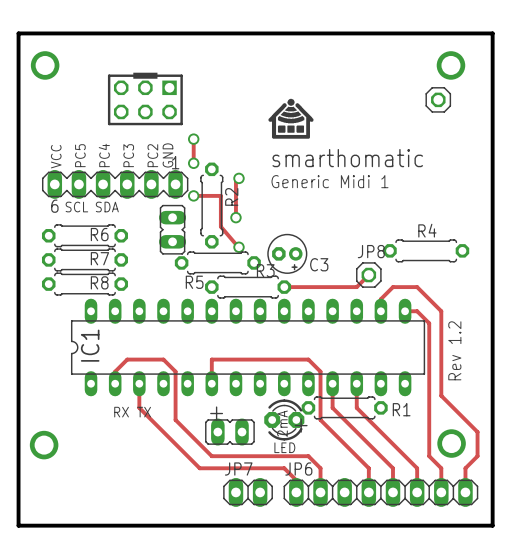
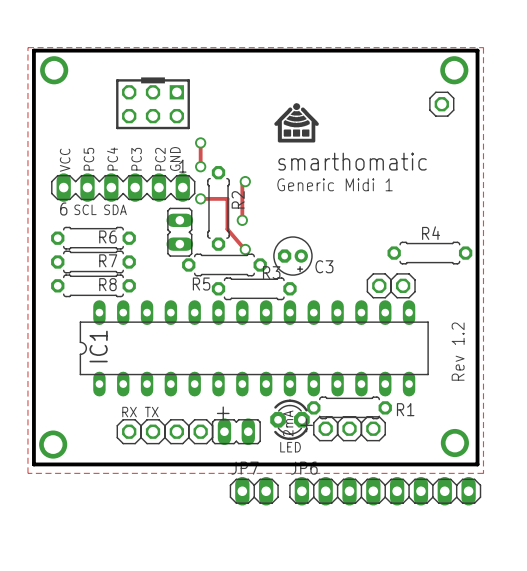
board edge: (18, 33) (18, 525) (492, 525) (492, 33) (18, 33) -> (33, 50) (33, 464) (477, 464) (477, 50) (33, 50)
zone outline: none -> (27, 47) (483, 47) (483, 473) (27, 473) (27, 47)
track: (368, 275) (356, 287) (284, 287) -> none
JP8: (368, 275) -> none
part: none -> (379, 285)
part: none -> (403, 285)
track: (380, 311) (380, 299) (393, 287) (417, 287) (441, 311) (441, 395) (477, 432) (477, 456) (465, 468) (465, 492) -> none
track: (405, 311) (417, 311) (429, 323) (429, 456) (441, 468) (441, 492) -> none
track: (115, 383) (115, 371) (127, 359) (163, 359) (175, 371) (175, 419) (211, 456) (308, 456) (320, 468) (320, 492) -> none
track: (139, 383) (139, 407) (199, 468) (284, 468) (296, 480) (296, 492) -> none
track: (211, 383) (211, 359) (308, 359) (320, 371) (320, 419) (368, 468) (368, 492) -> none
track: (332, 383) (332, 407) (393, 468) (393, 492) -> none
track: (356, 383) (356, 407) (417, 468) (417, 492) -> none
part: none -> (325, 428)
part: none -> (349, 428)
part: none -> (373, 428)
part: none -> (129, 431)
part: none -> (153, 431)
part: none -> (176, 431)
part: none -> (200, 431)

